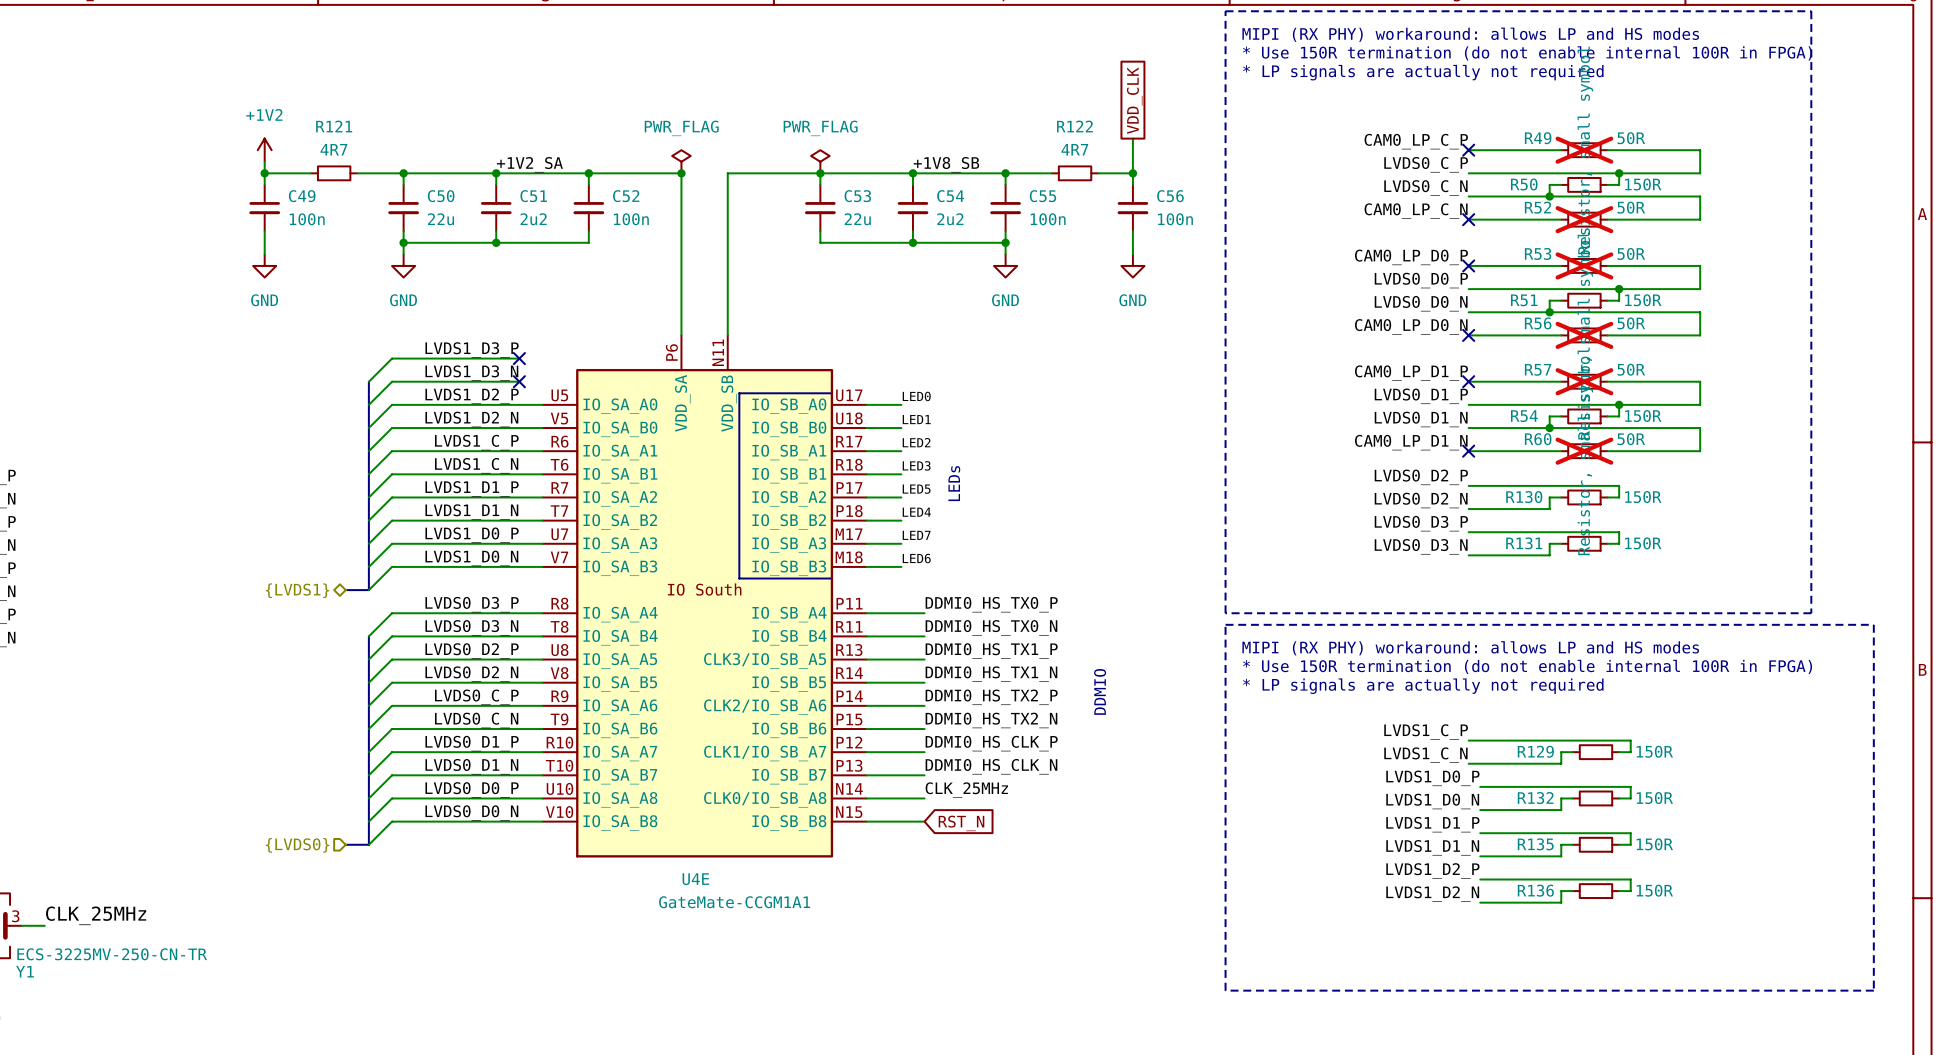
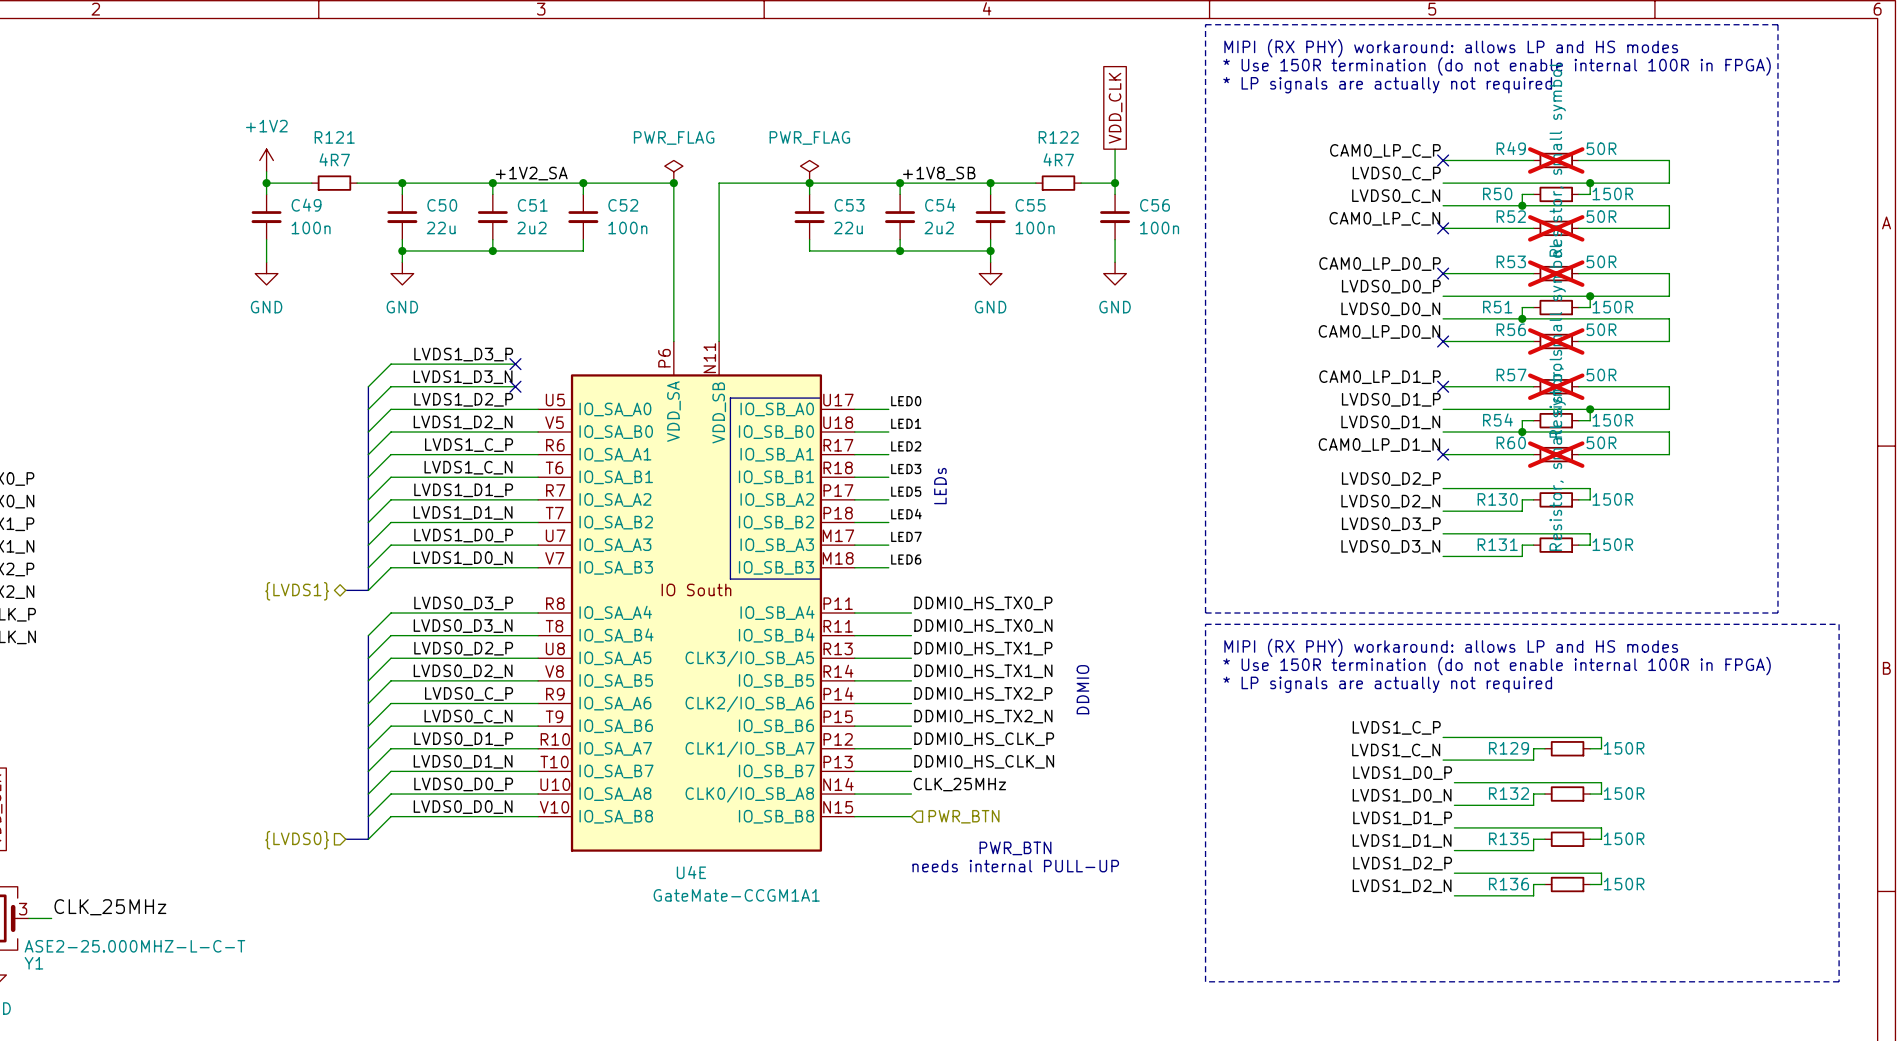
global label: RST_N (961, 823) -> none
hierarchical label: none -> PWR_BTN (964, 816)
text: none -> PWR_BTN (1015, 848)
text: none -> needs internal PULL-UP (1015, 866)
Y1 value: ECS-3225MV-250-CN-TR (112, 954) -> ASE2-25.000MHZ-L-C-T (134, 946)

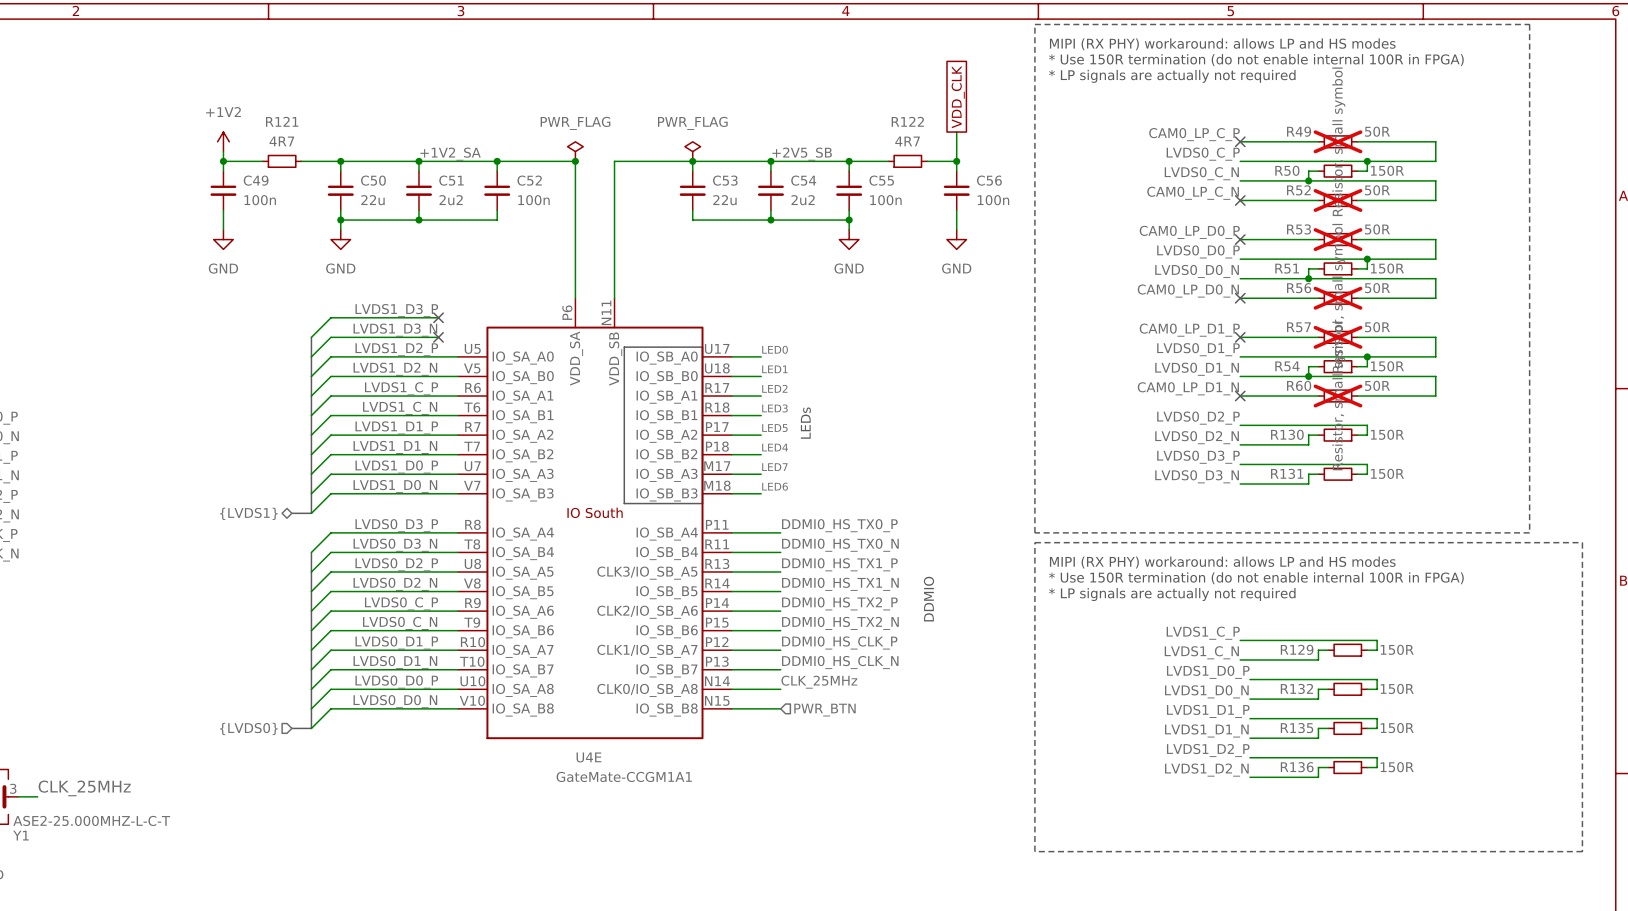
label: +1V8_SB (939, 173) -> +2V5_SB (802, 154)
text: PWR_BTN (1015, 848) -> none
text: needs internal PULL-UP (1015, 866) -> none

